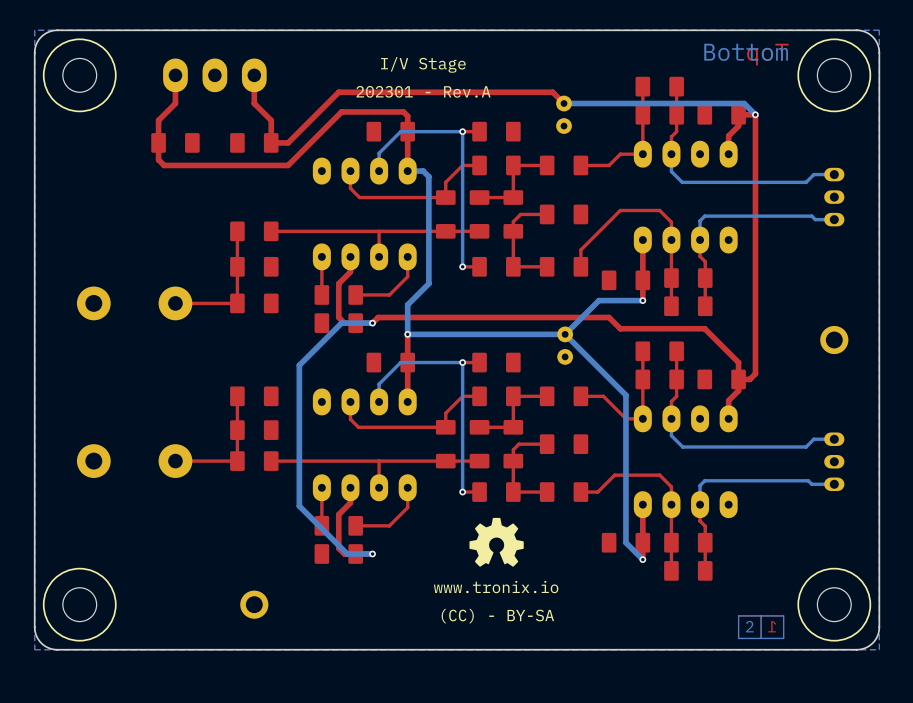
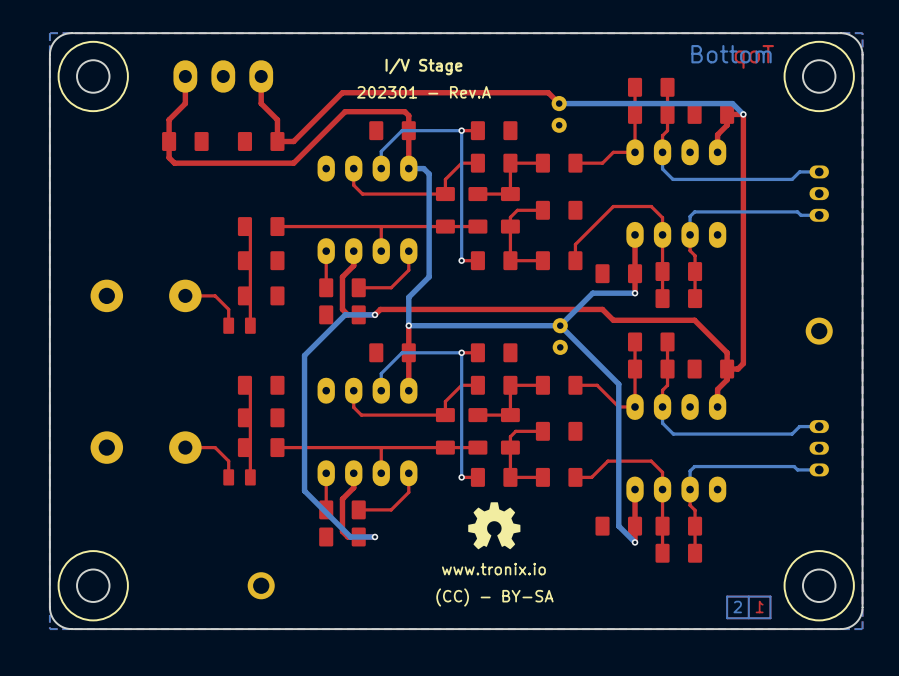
top track: (237, 231) (237, 303) (206, 303) -> (228, 325) (228, 309) (215, 295)
top track: none -> (250, 226) (250, 325)
part: none -> (239, 325)
top track: (237, 396) (237, 461) (206, 461) -> (228, 477) (228, 461) (215, 447)
top track: none -> (250, 385) (250, 477)
part: none -> (239, 477)

